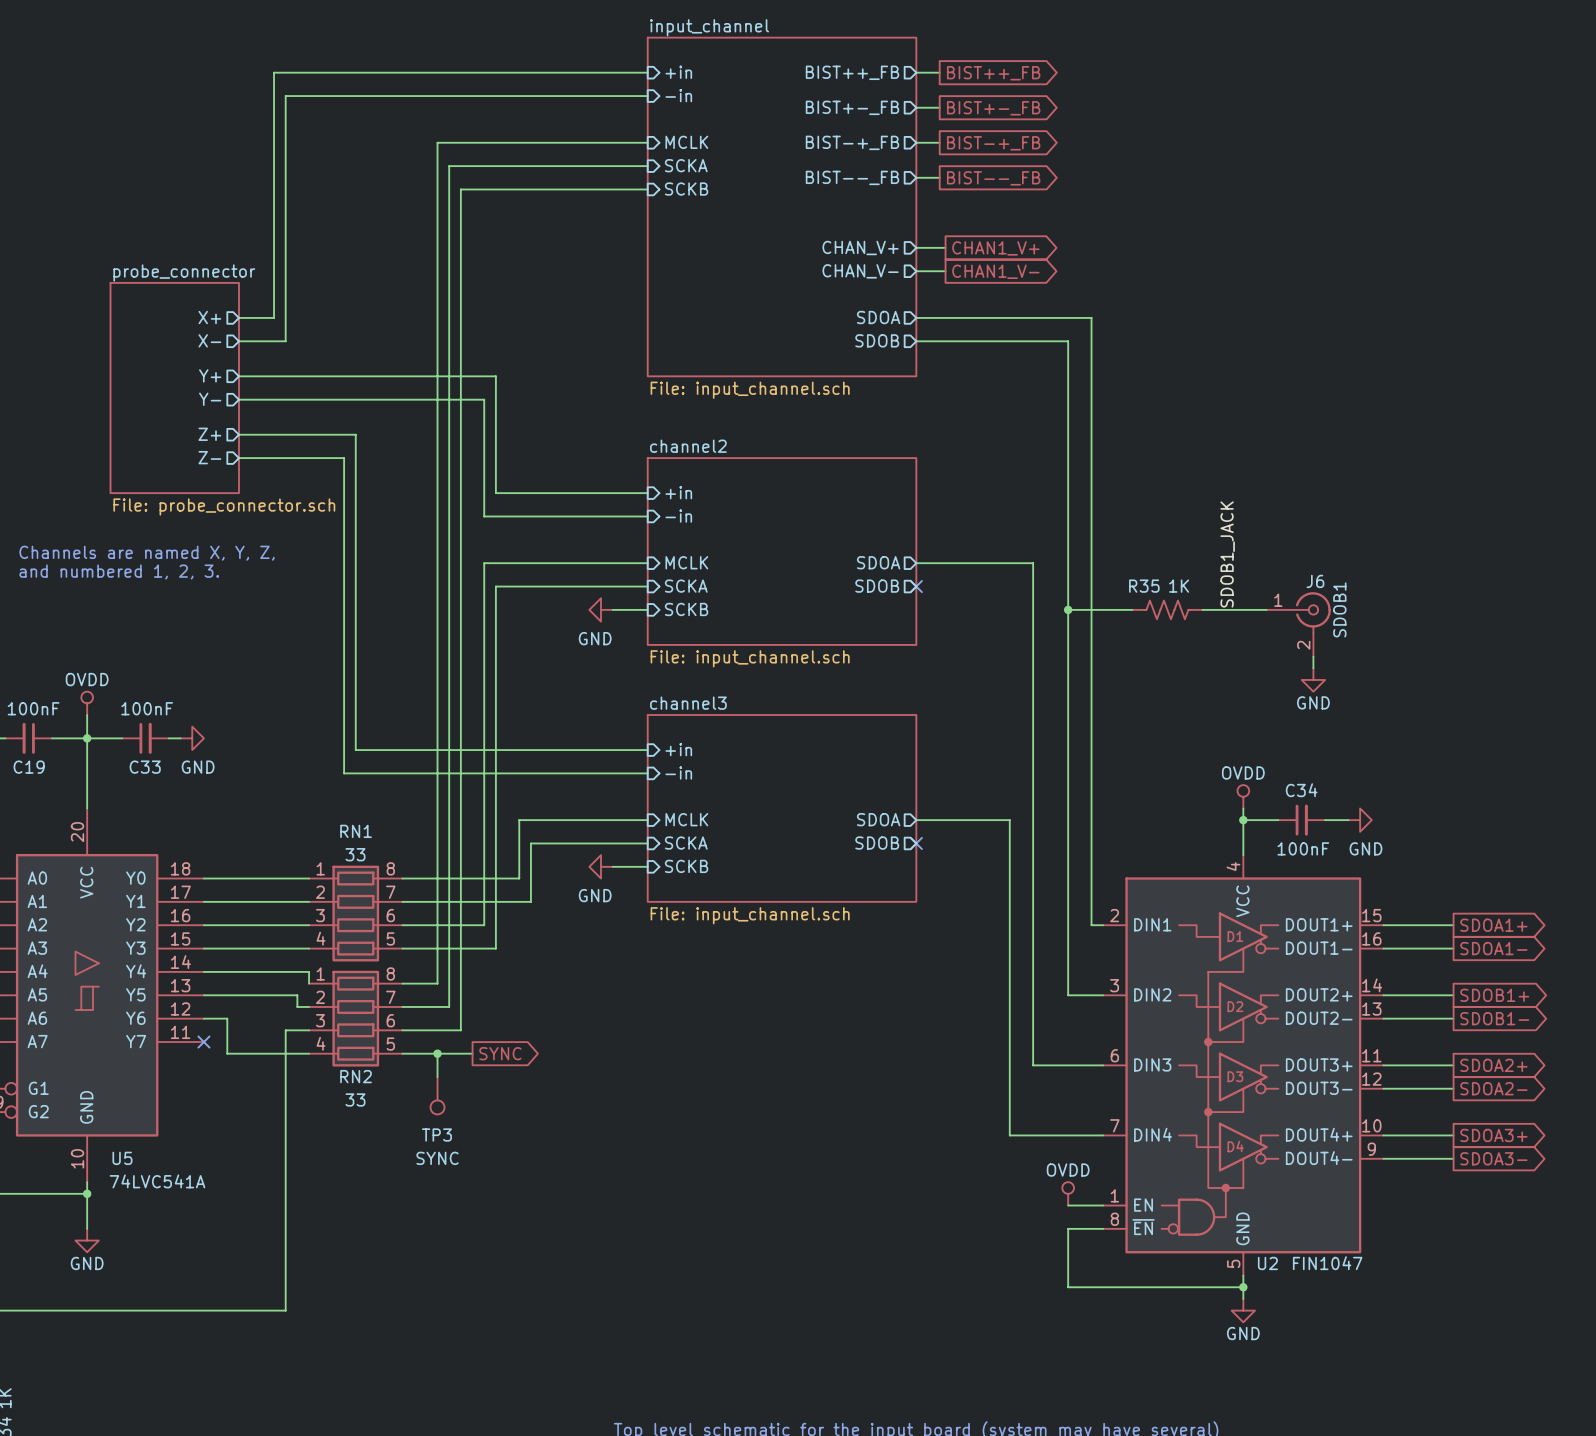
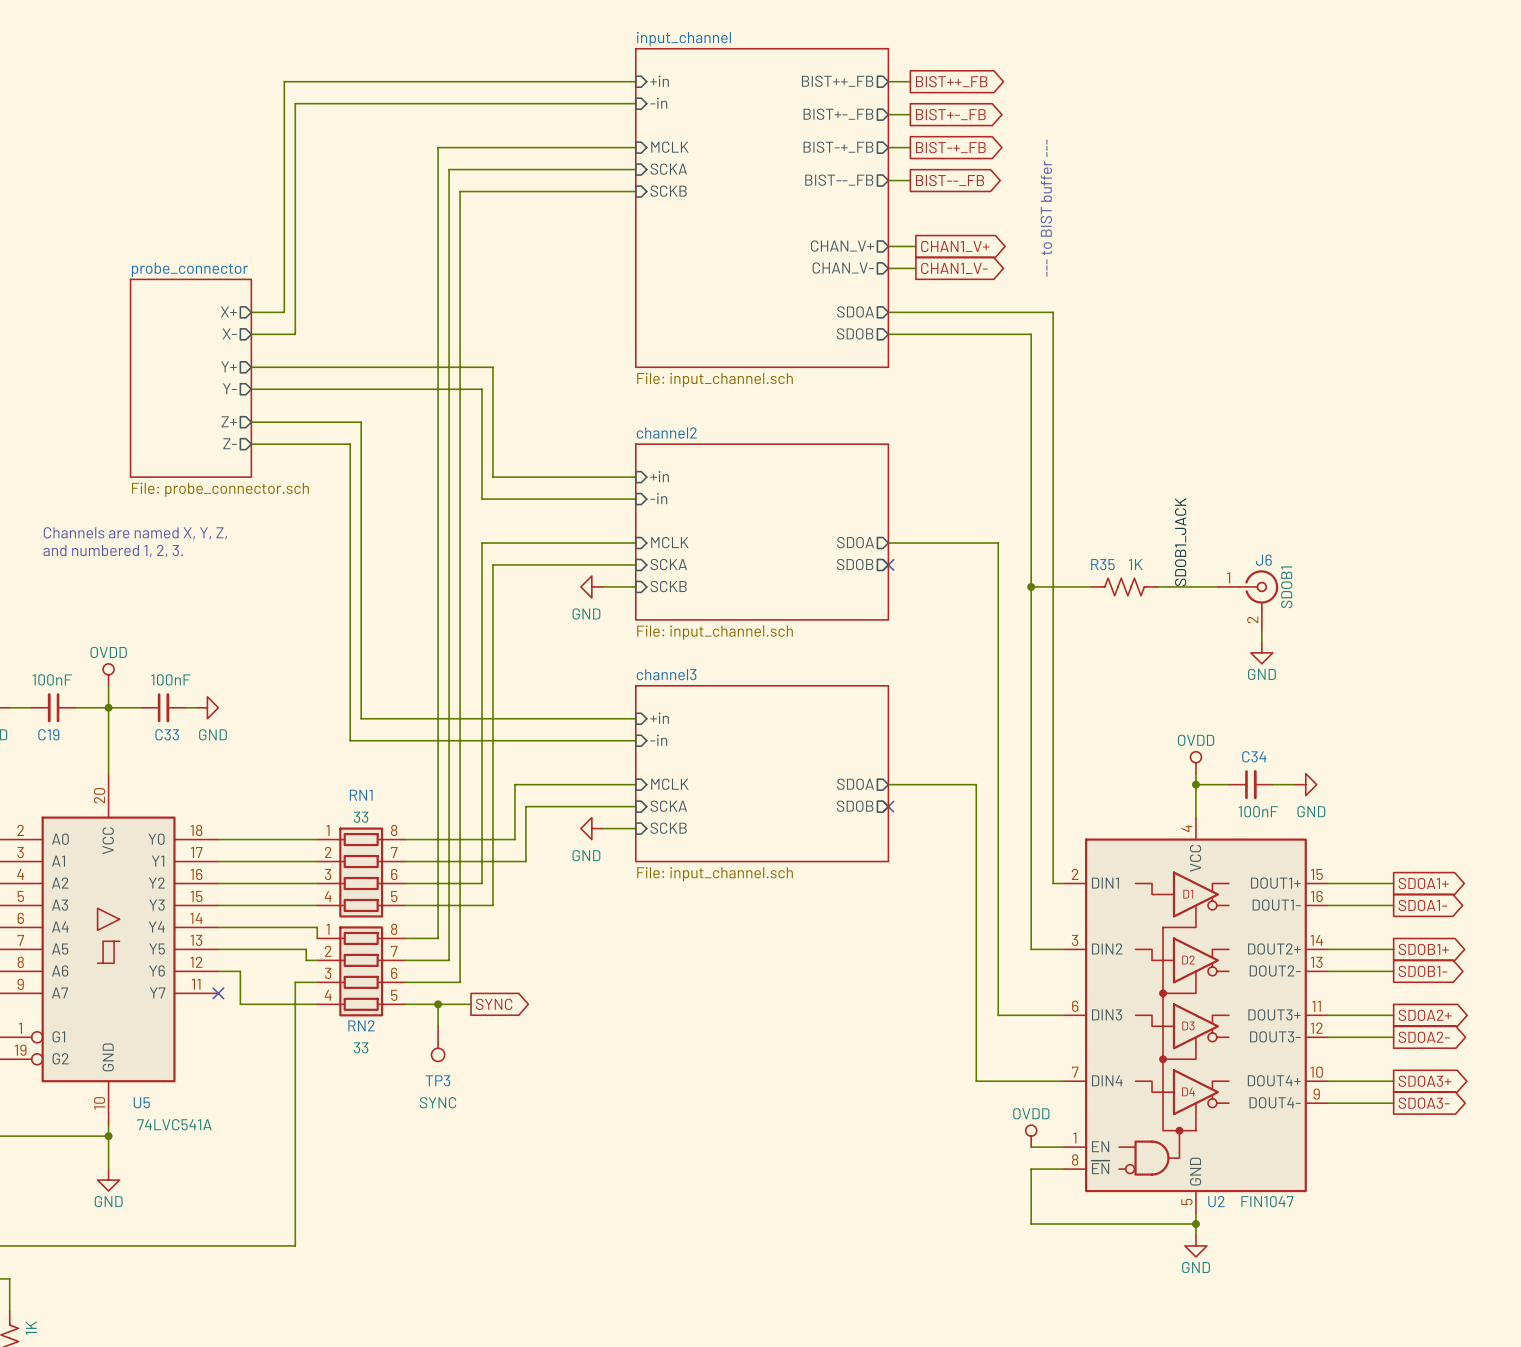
text: none -> --- to BIST buffer --- (1046, 208)

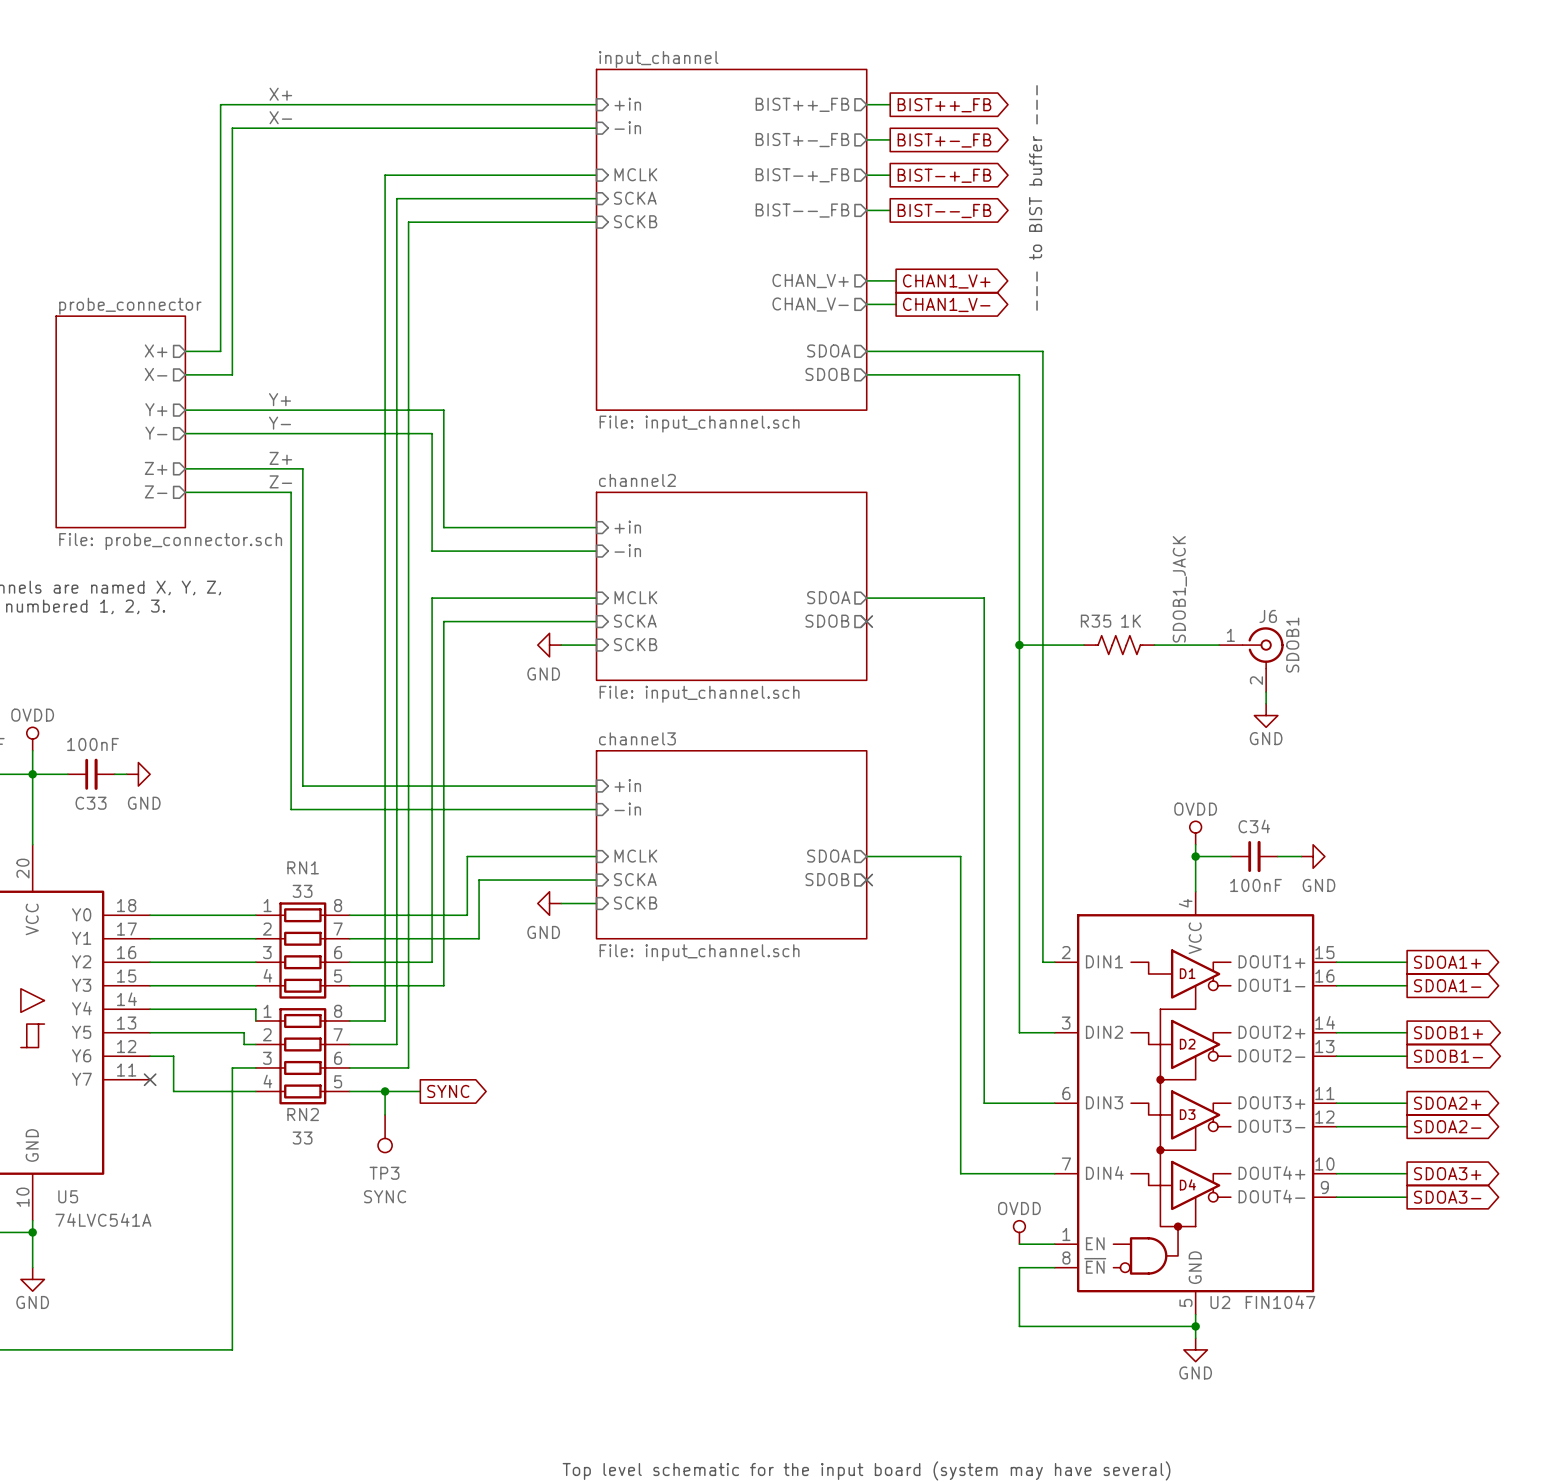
label: none -> X+ (280, 94)
label: none -> X- (280, 117)
label: none -> Y+ (280, 399)
label: none -> Y- (280, 423)
label: none -> Z+ (280, 458)
label: none -> Z- (280, 481)

